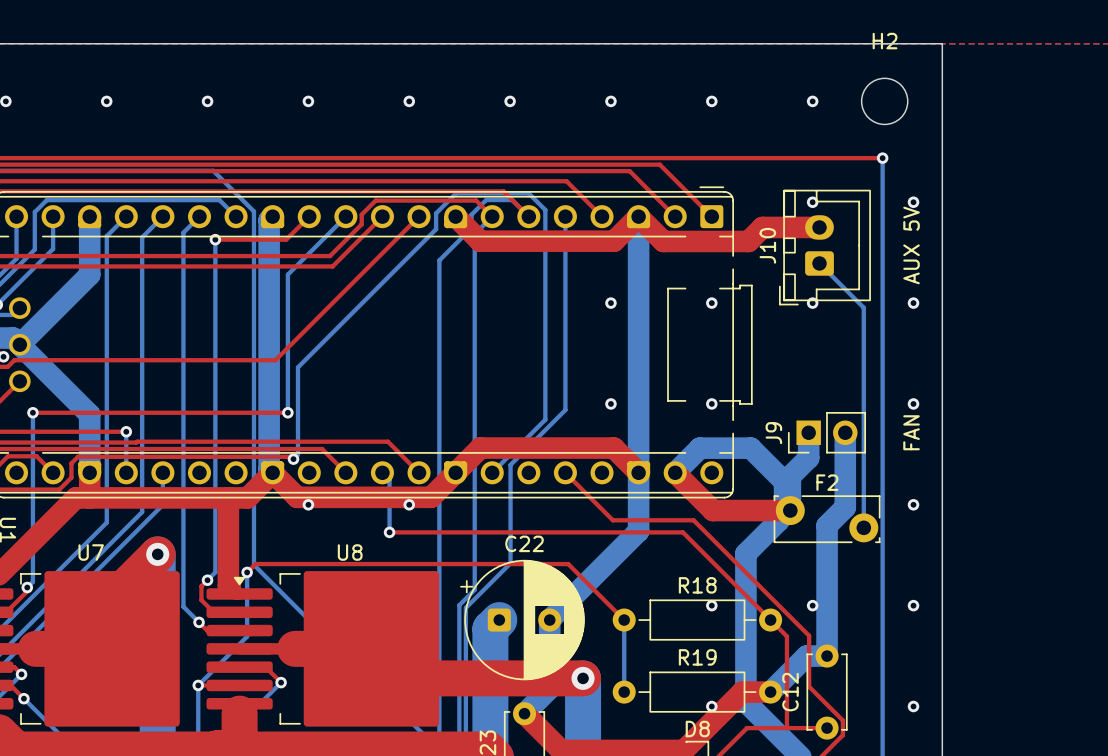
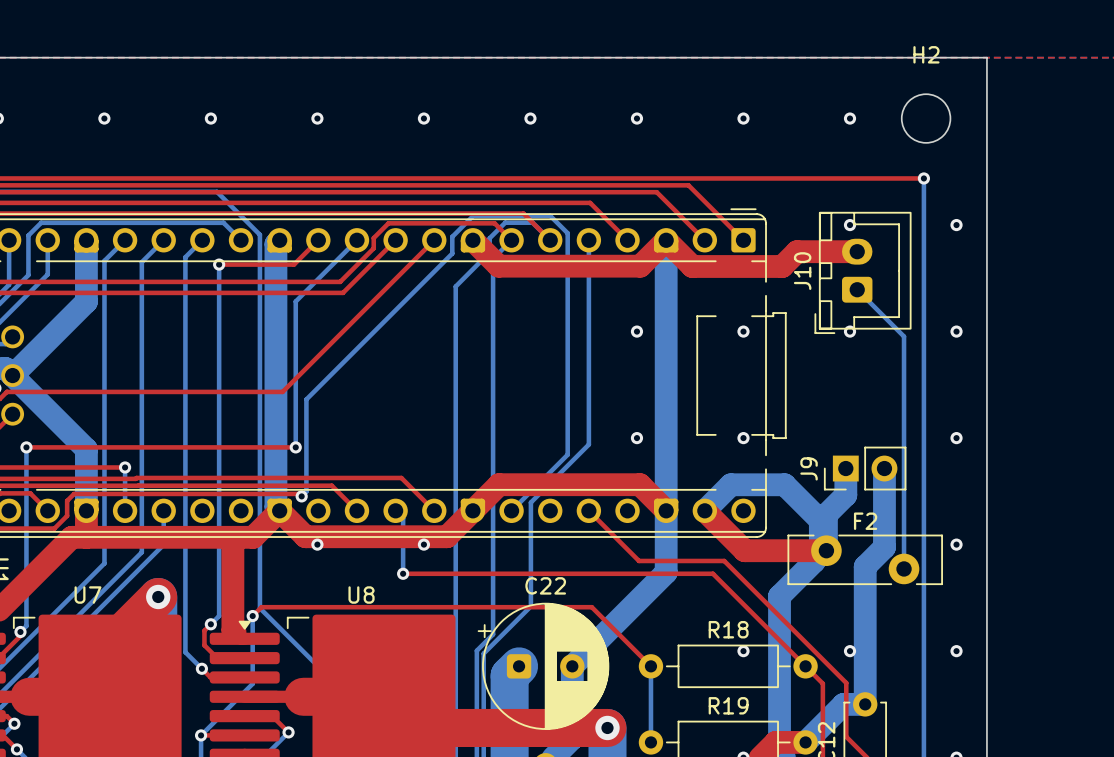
text: AUX 5V (911, 245) -> none
text: FAN (911, 432) -> none
F2 footprint: [773, 495, 881, 544] -> [787, 534, 943, 586]

